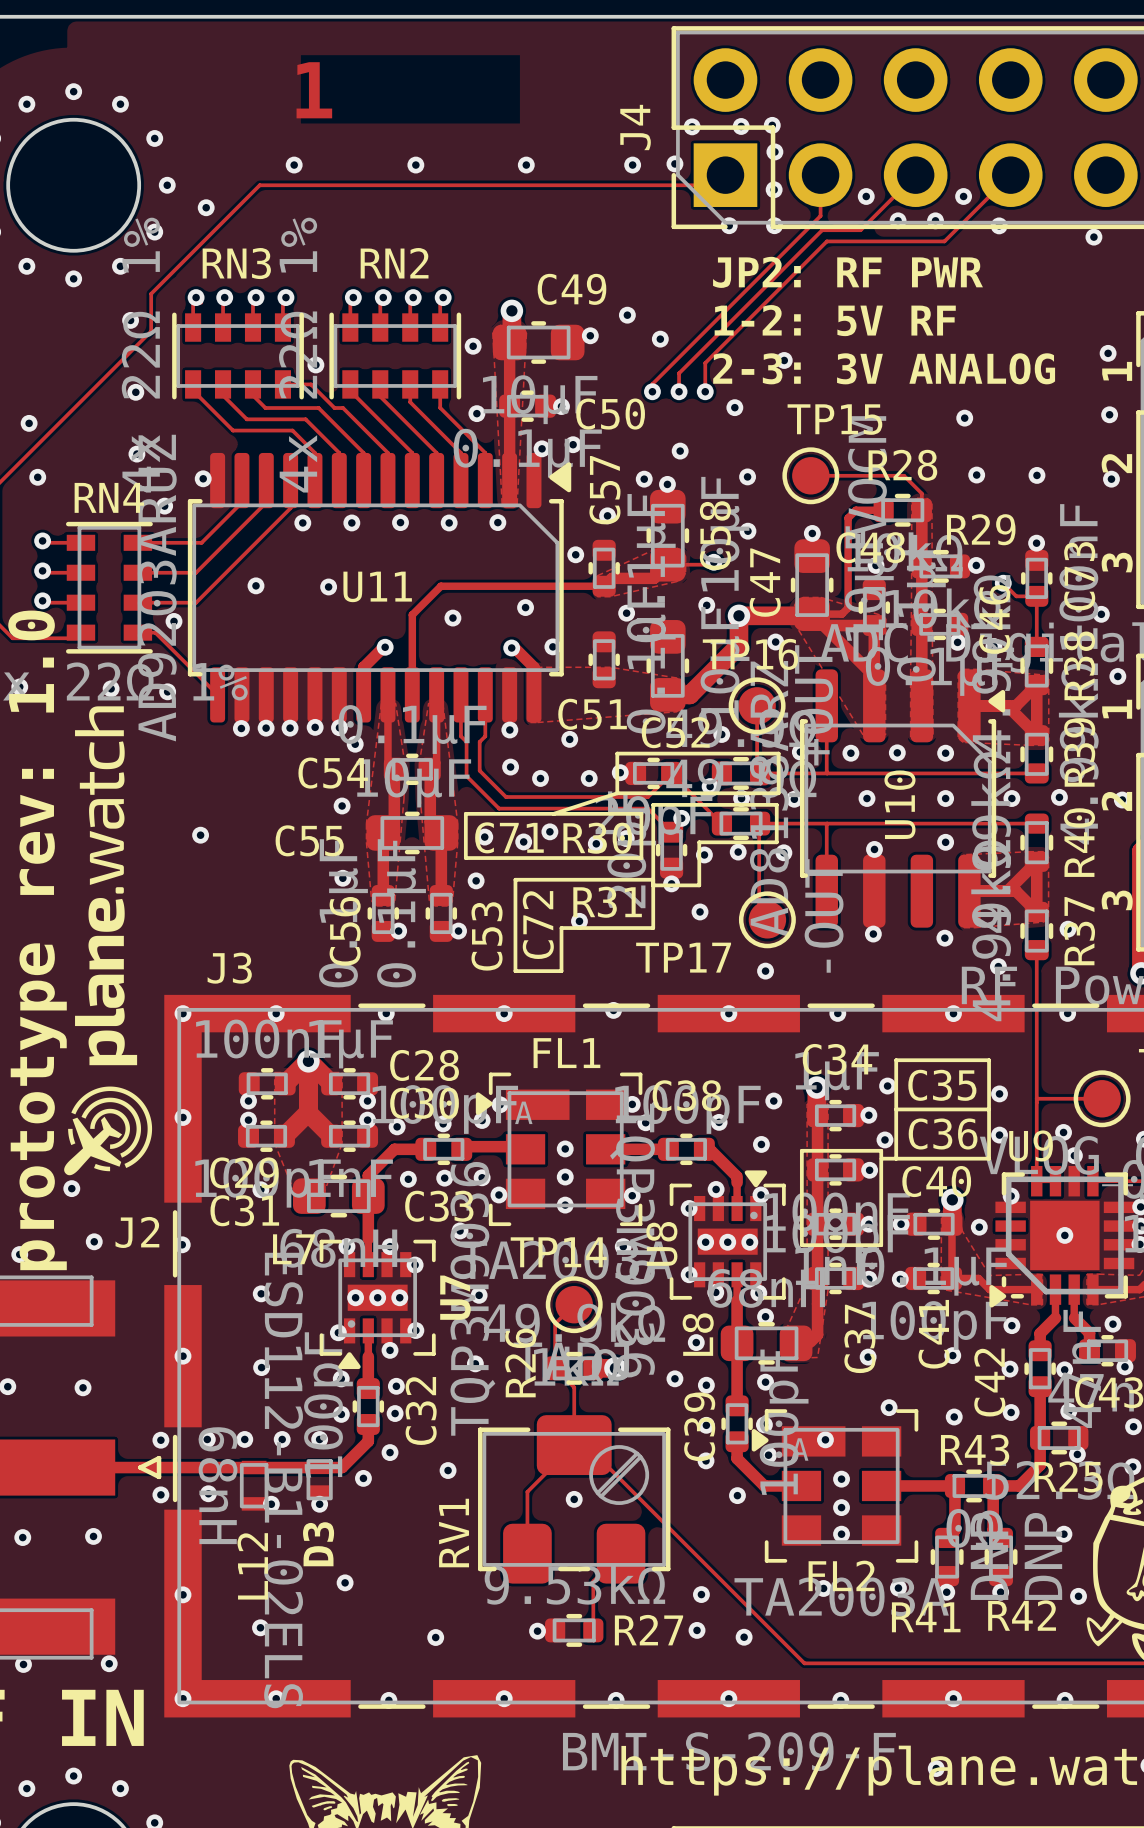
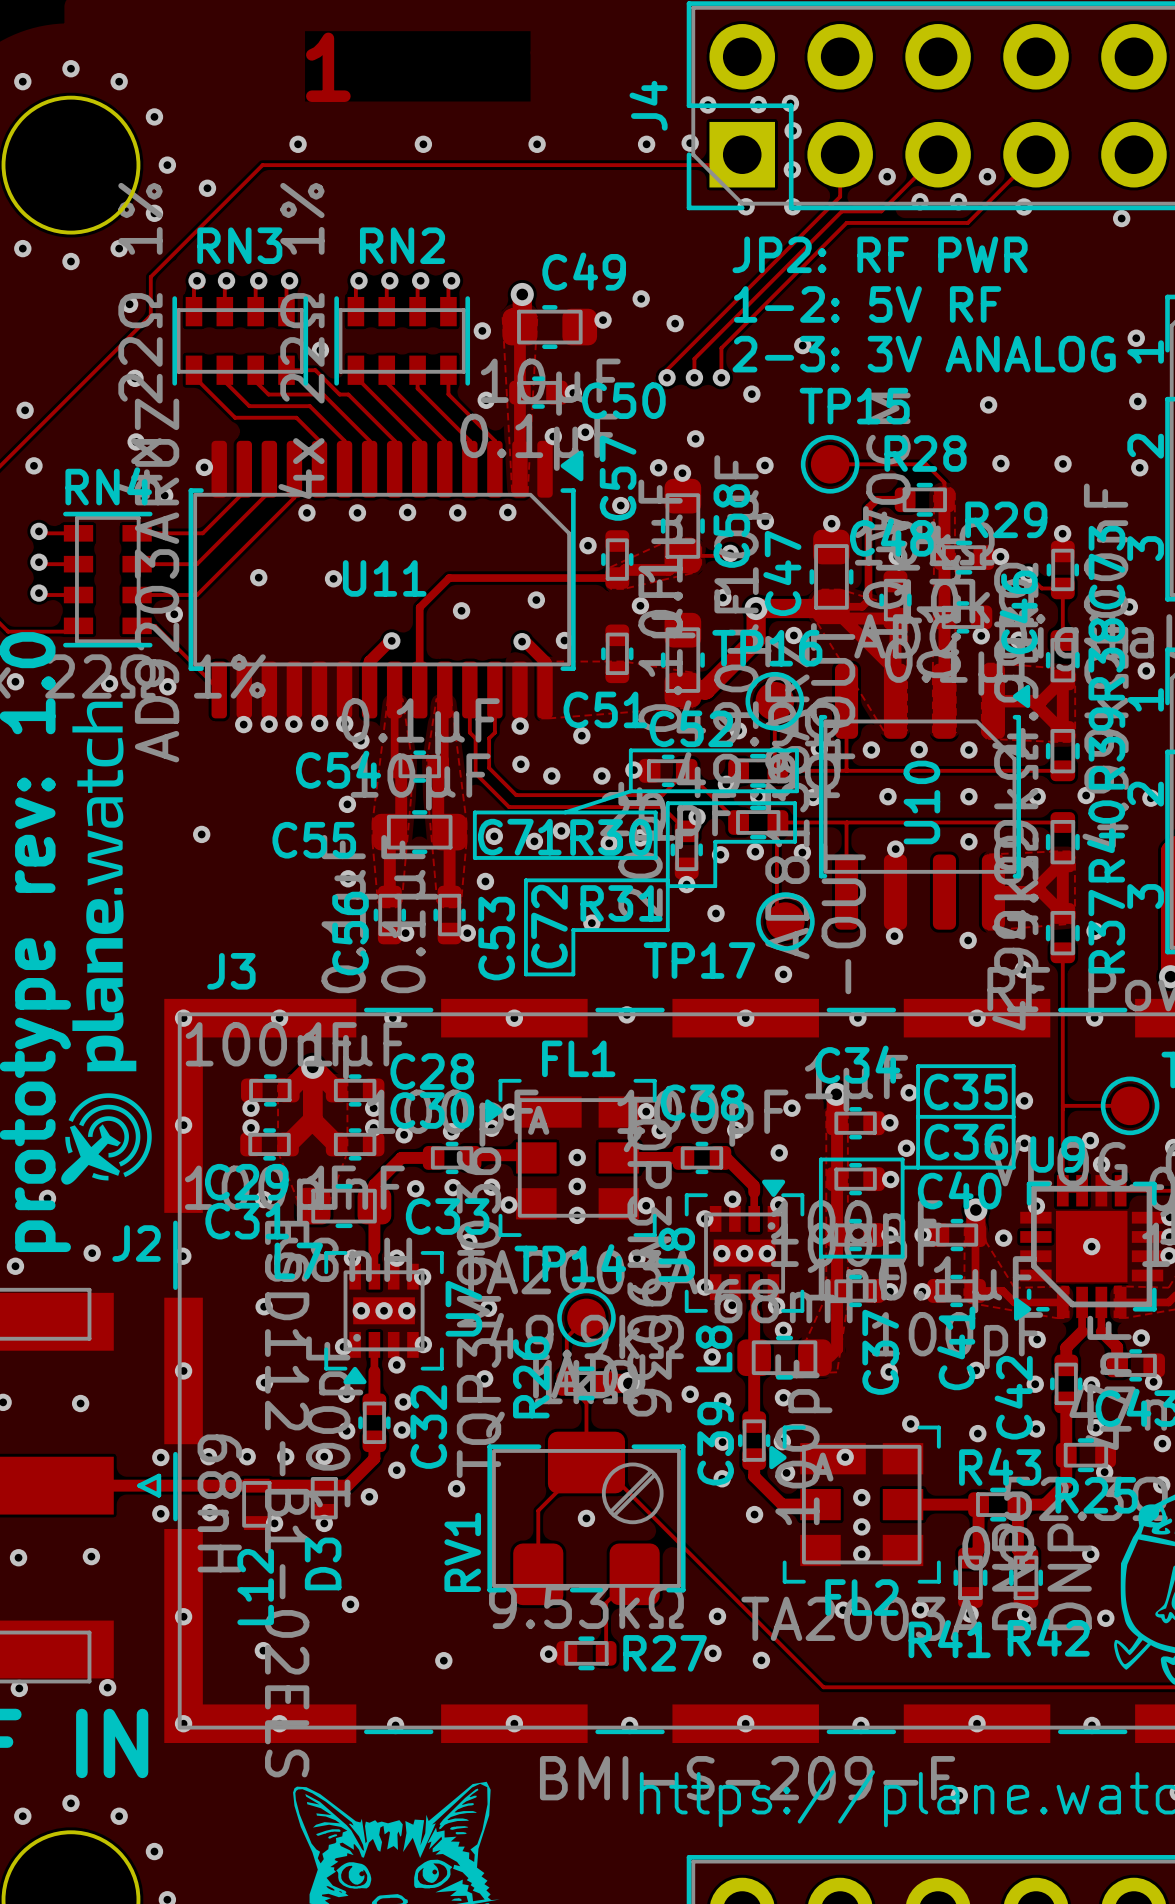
via position: (71, 1188) -> (47, 1198)

